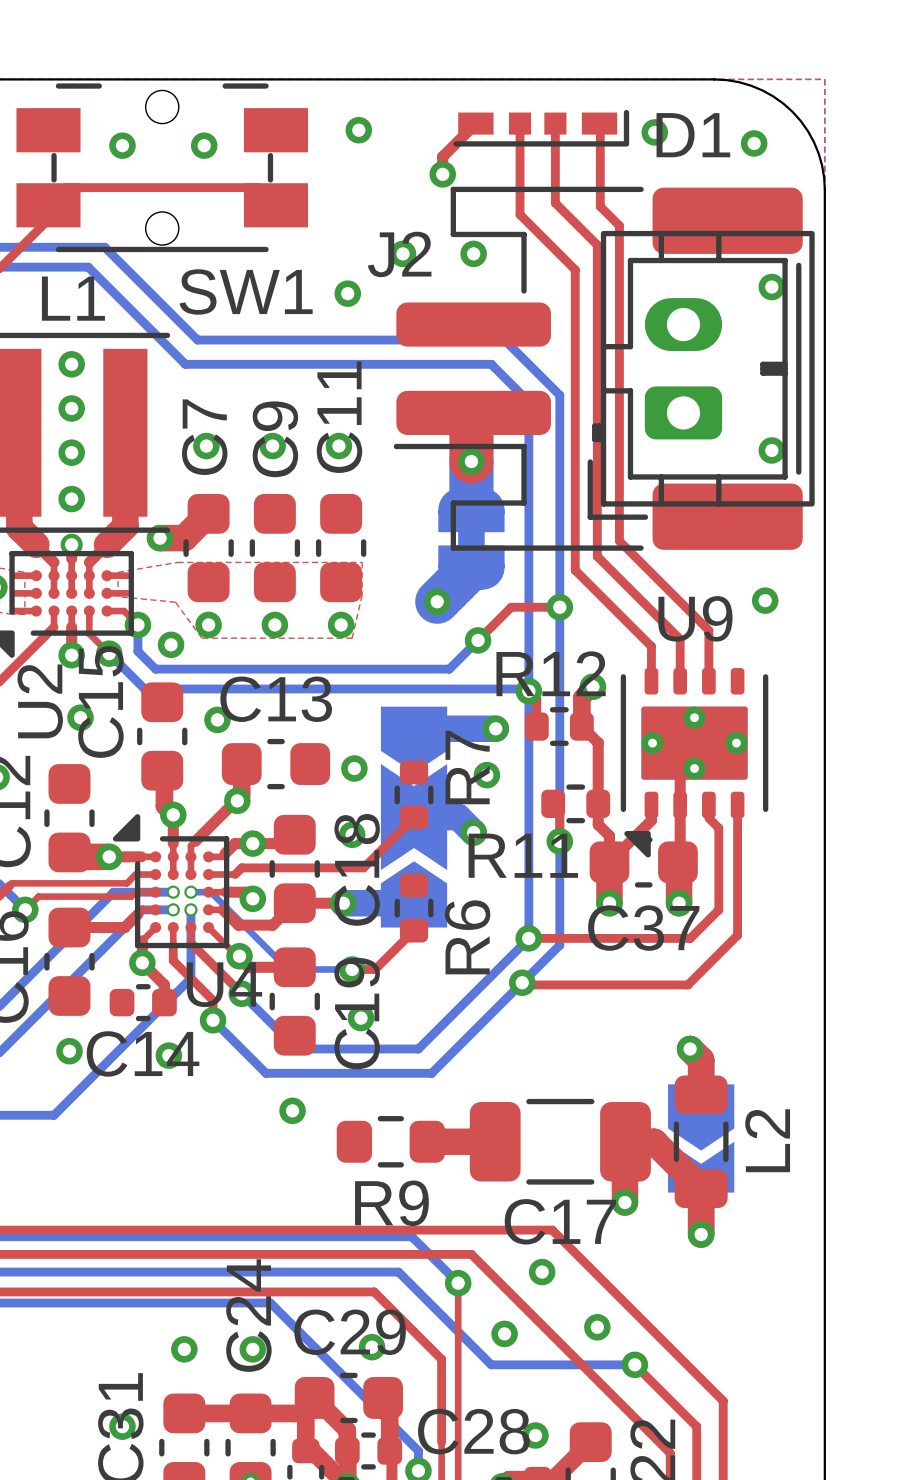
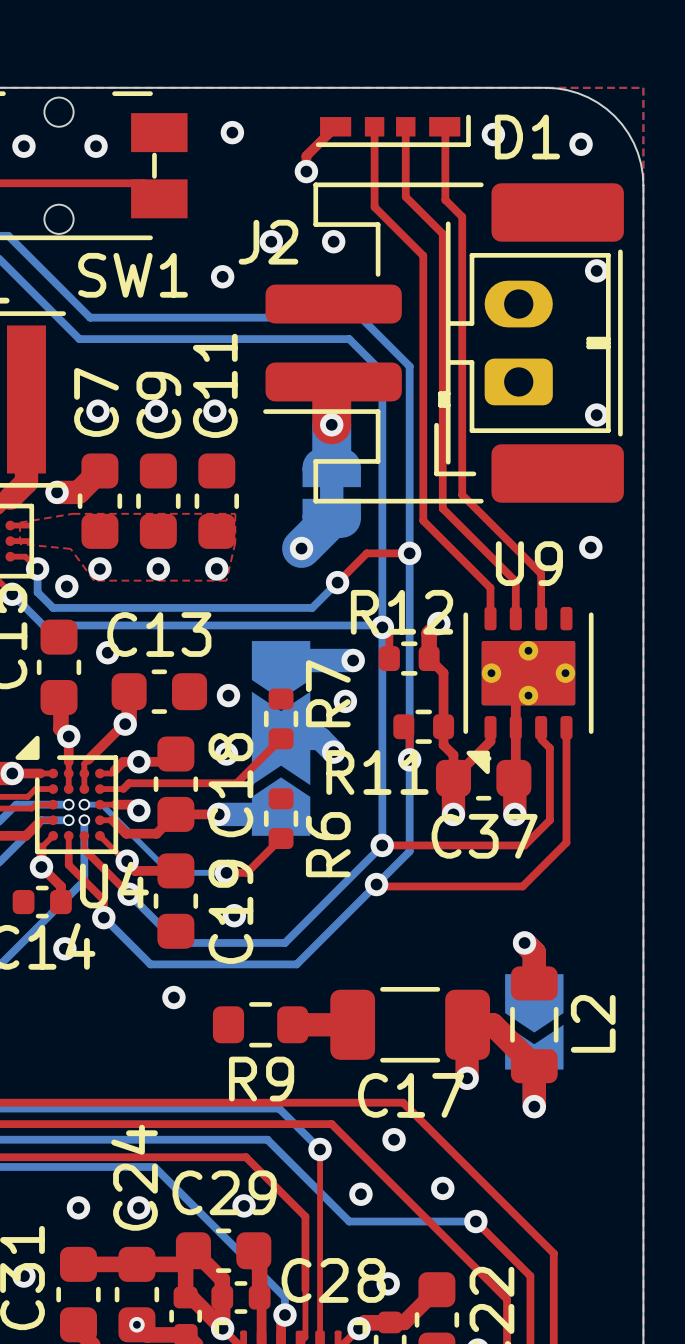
part footprint: [587, 230, 815, 520] -> [434, 221, 611, 477]

